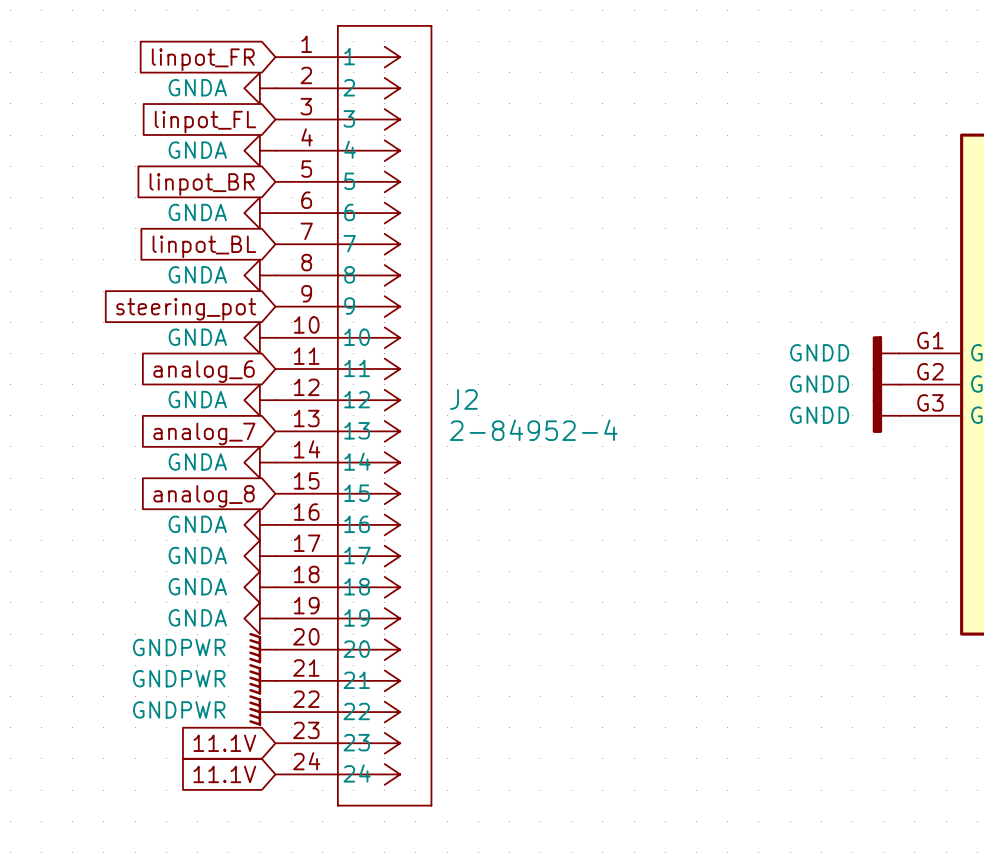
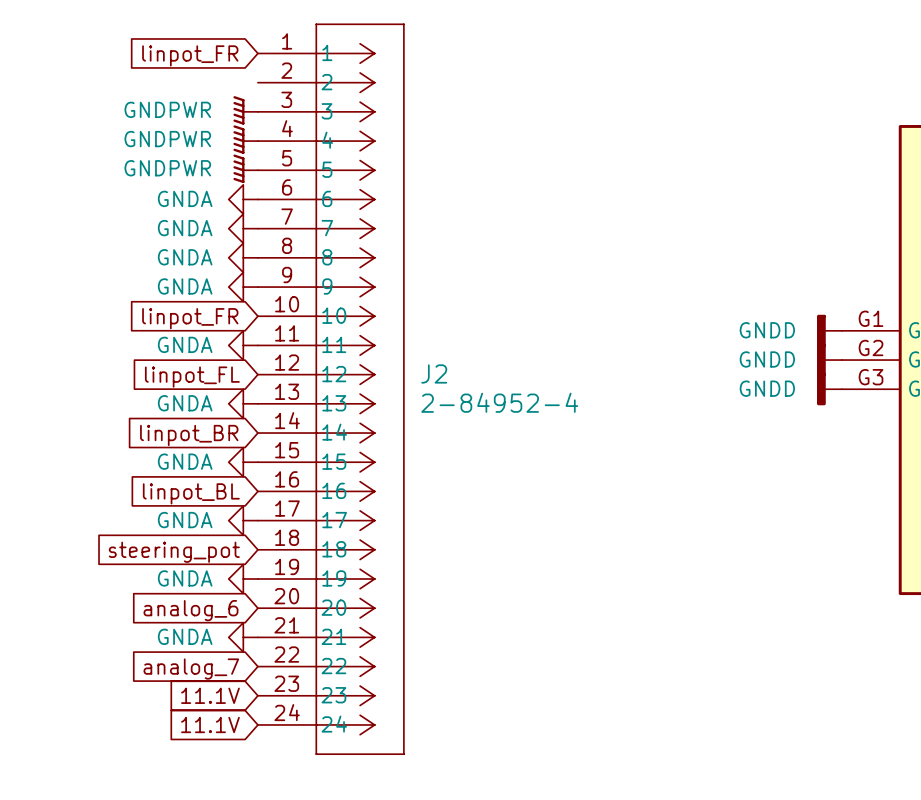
power symbol: GNDA (259, 88) -> none
power symbol: none -> GNDPWR (245, 110)
global label position: linpot_FL (205, 122) -> linpot_FL (192, 377)
power symbol: GNDA (259, 150) -> GNDPWR (245, 139)
power symbol: none -> GNDPWR (245, 168)
global label position: linpot_BR (202, 184) -> linpot_BR (189, 435)
power symbol: none -> GNDA (243, 228)
global label position: linpot_BL (204, 246) -> linpot_BL (191, 493)
power symbol: none -> GNDA (243, 287)
global label position: steering_pot (186, 309) -> steering_pot (174, 552)
power symbol: GNDA (259, 337) -> none
global label: none -> linpot_FR (190, 318)
power symbol: none -> GNDA (243, 345)
global label position: analog_6 (204, 371) -> analog_6 (190, 610)
power symbol: GNDA (259, 400) -> none
power symbol: none -> GNDA (243, 403)
global label position: analog_7 (204, 433) -> analog_7 (191, 669)
power symbol: GNDA (259, 462) -> none
power symbol: none -> GNDA (243, 462)
global label: analog_8 (204, 496) -> none
power symbol: GNDA (259, 524) -> none
power symbol: GNDA (259, 587) -> none
power symbol: GNDPWR (262, 648) -> none
power symbol: GNDPWR (262, 679) -> GNDA (243, 637)
power symbol: GNDPWR (262, 710) -> none

